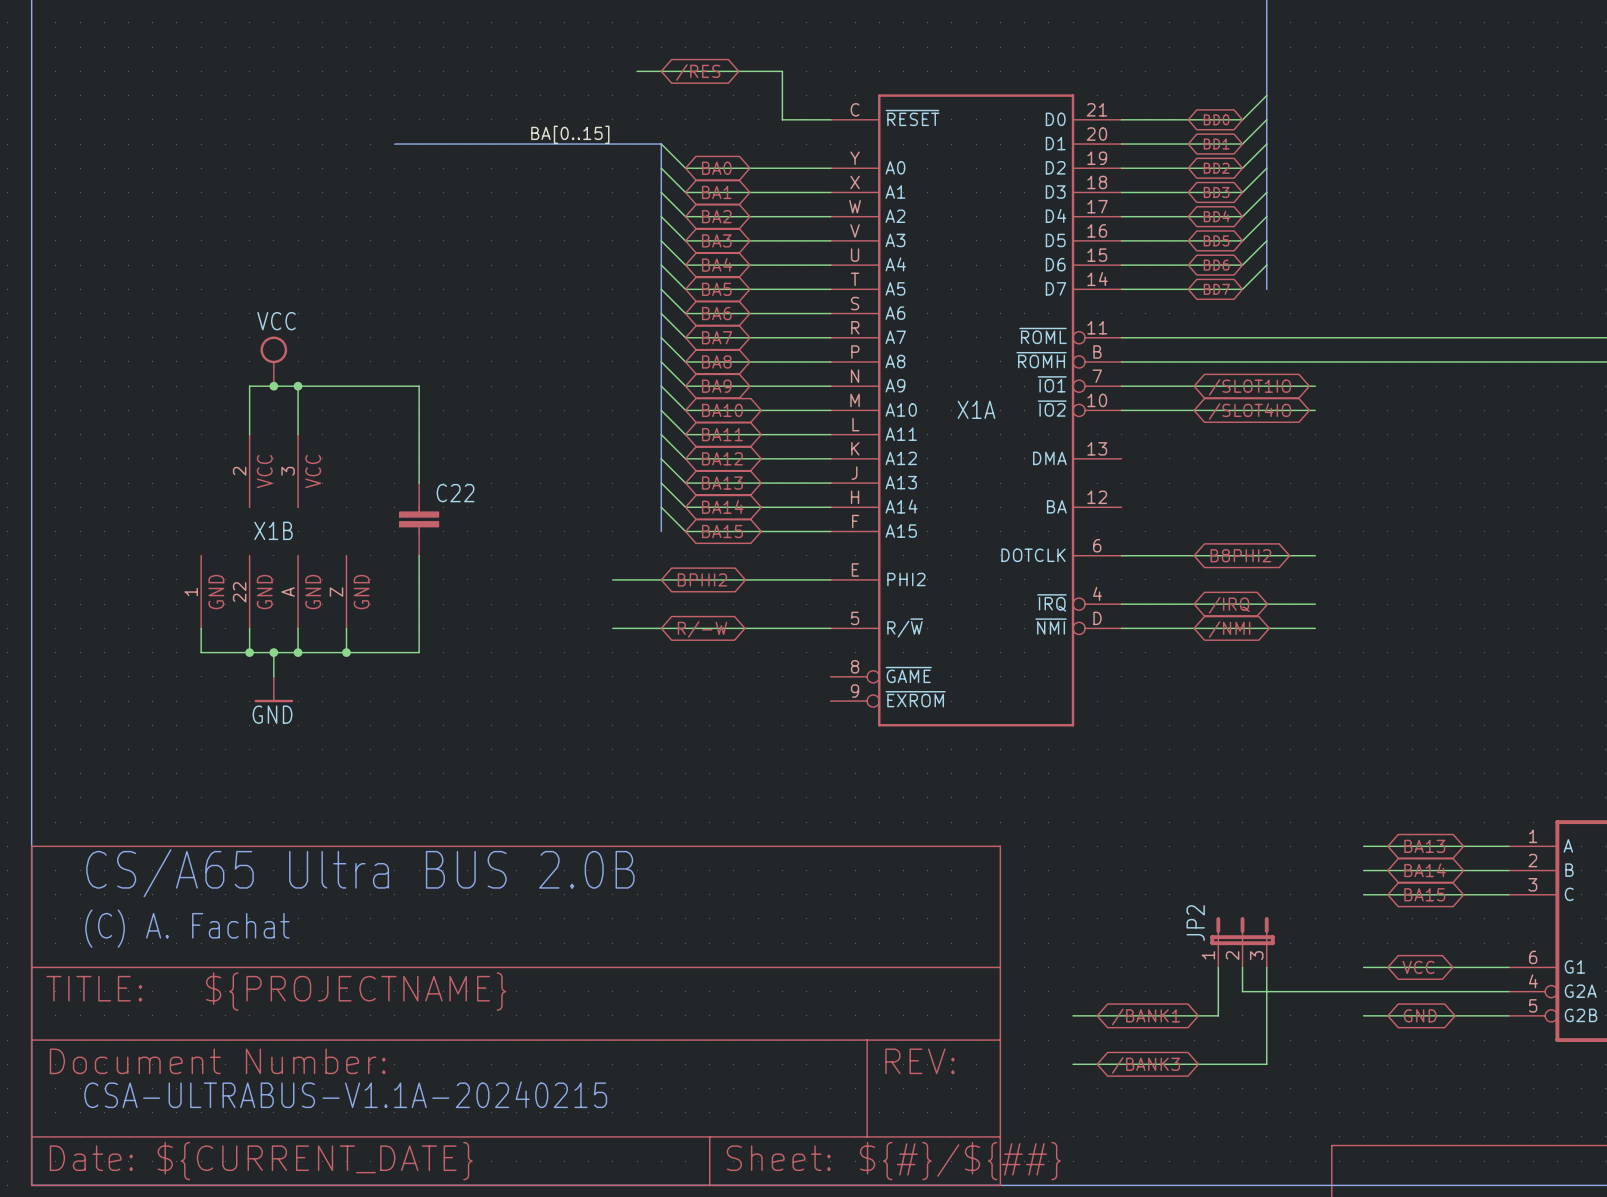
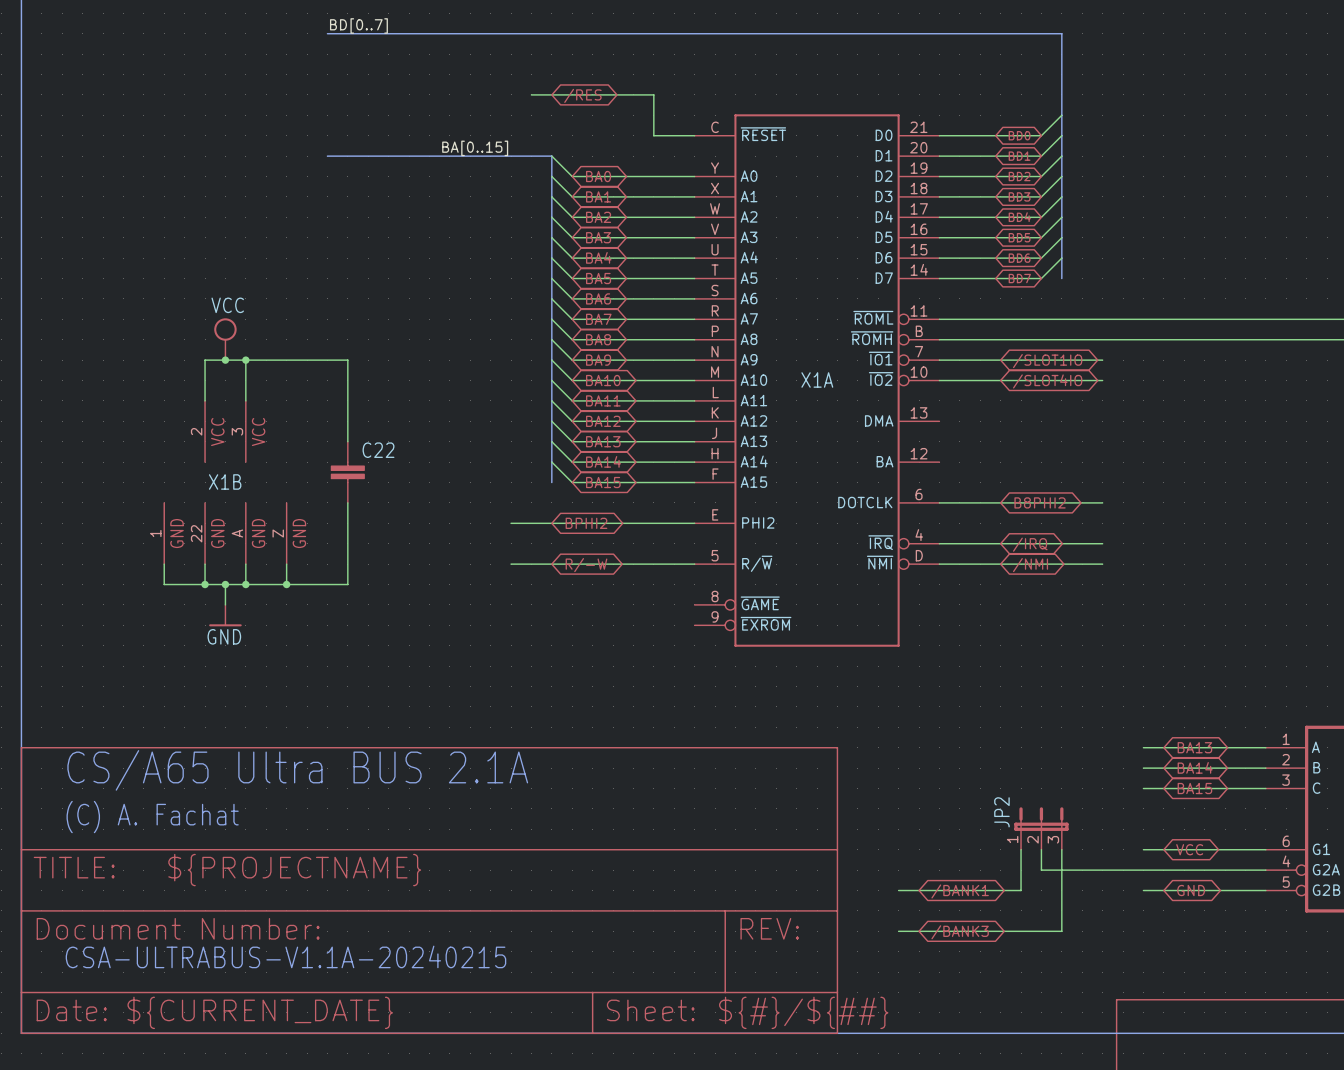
text: CS/A65 Ultra BUS 2.0B (360, 873) -> CS/A65 Ultra BUS 2.1A (297, 770)

